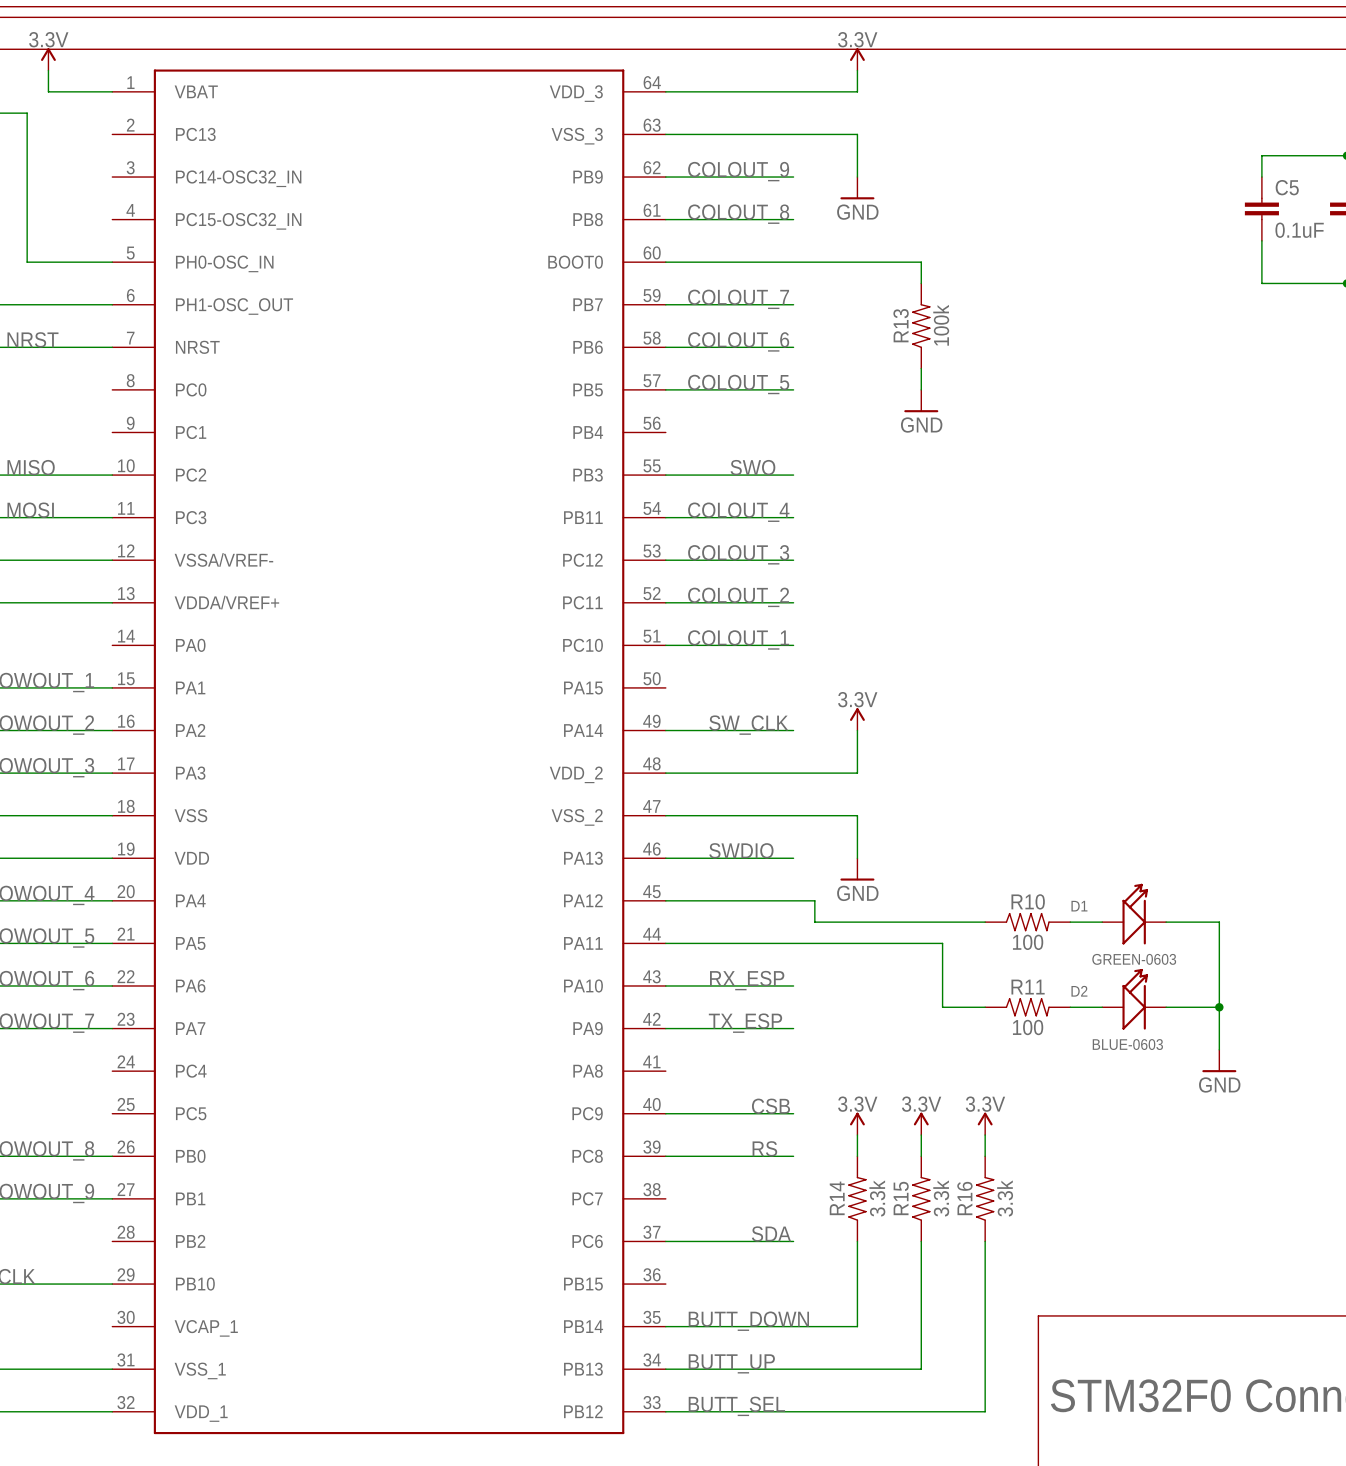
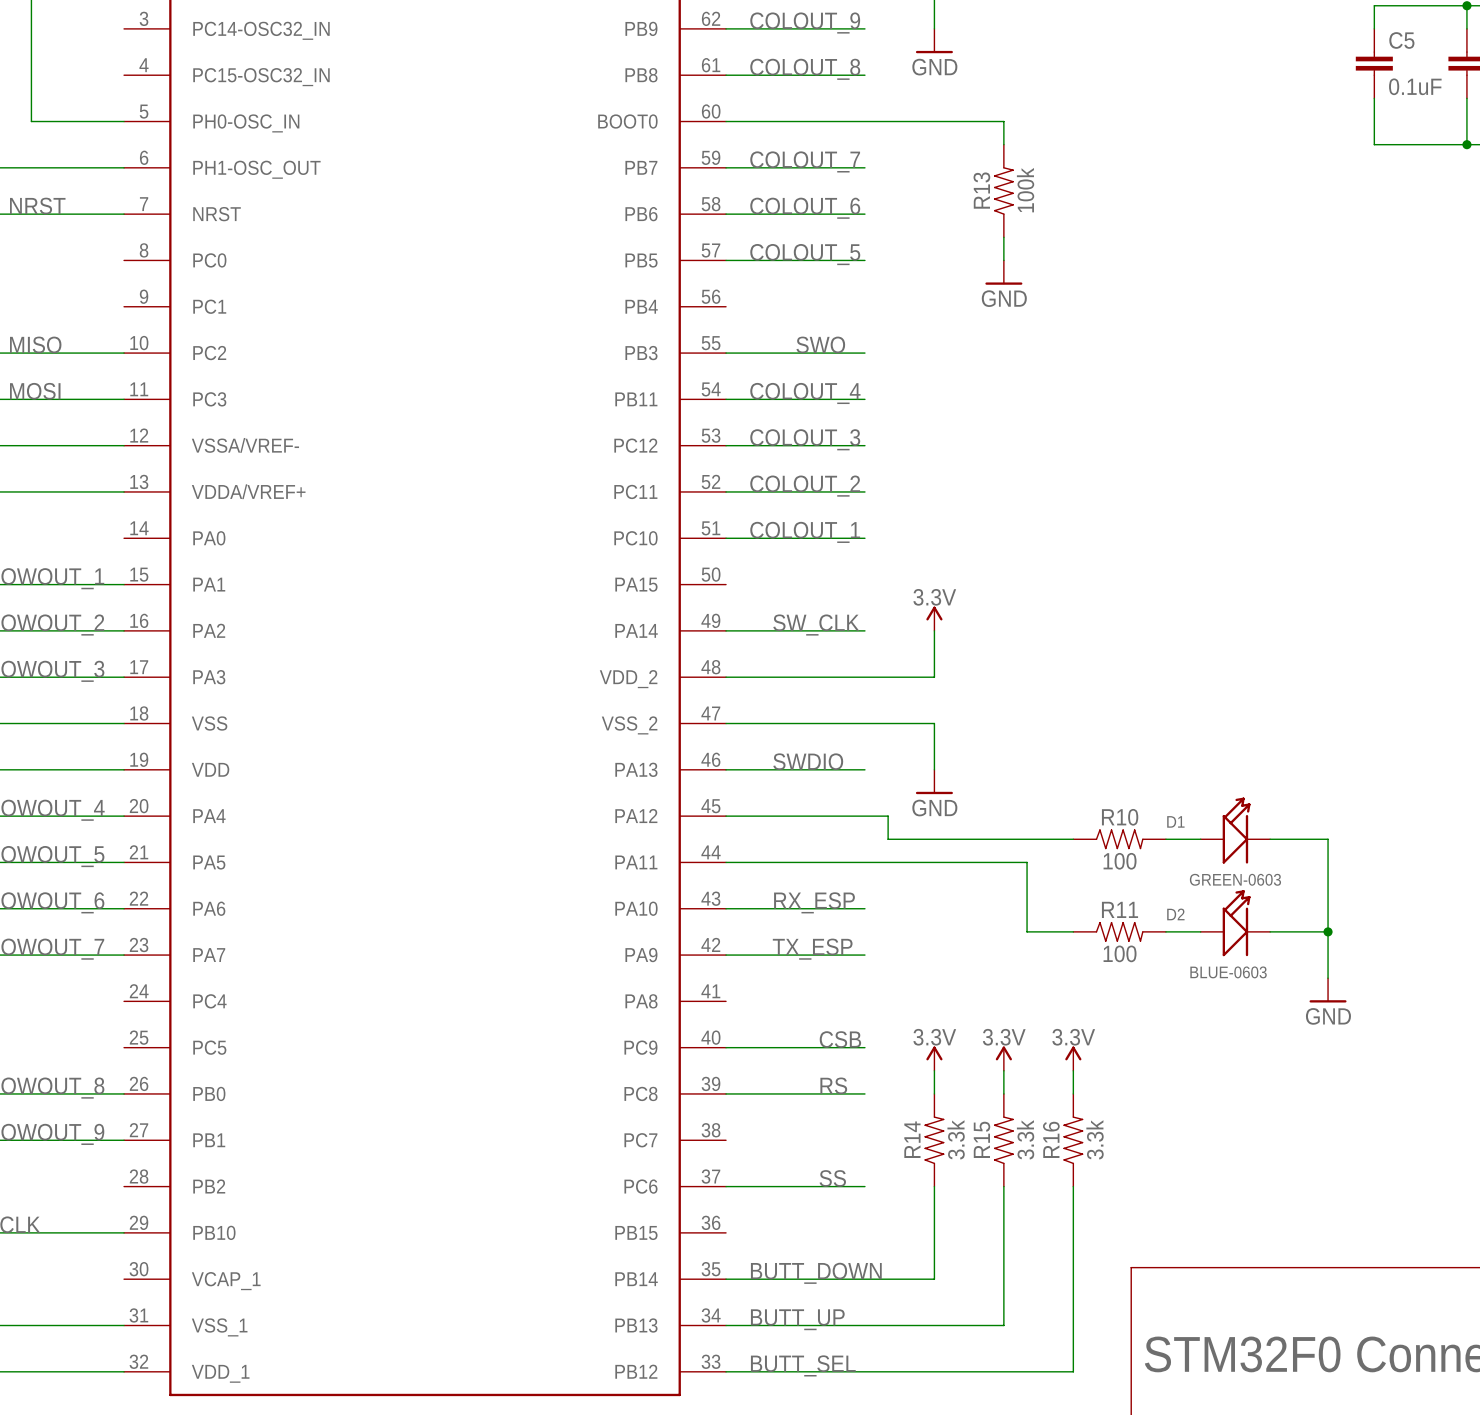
label: SDA (771, 1234) -> SS (832, 1178)

